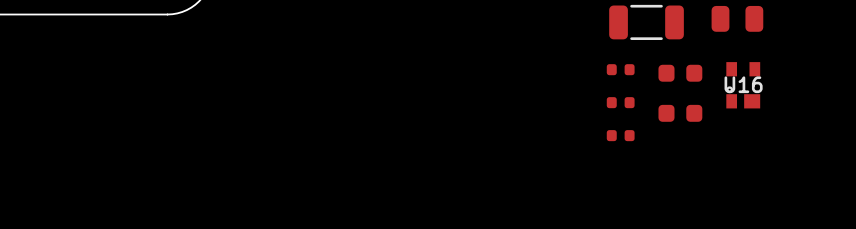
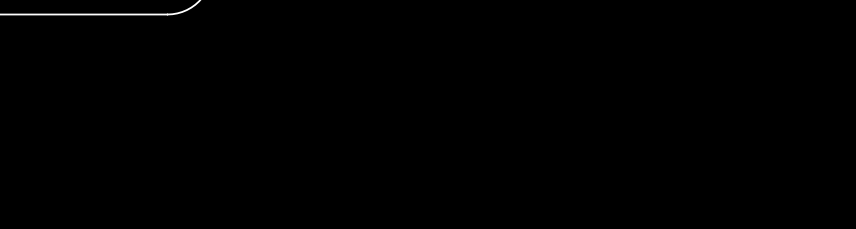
part: (737, 18) -> none
part: (646, 22) -> none
part: (620, 69) -> none
part: (680, 73) -> none
U16: (743, 85) -> none
part: (620, 102) -> none
part: (680, 113) -> none
part: (620, 135) -> none

